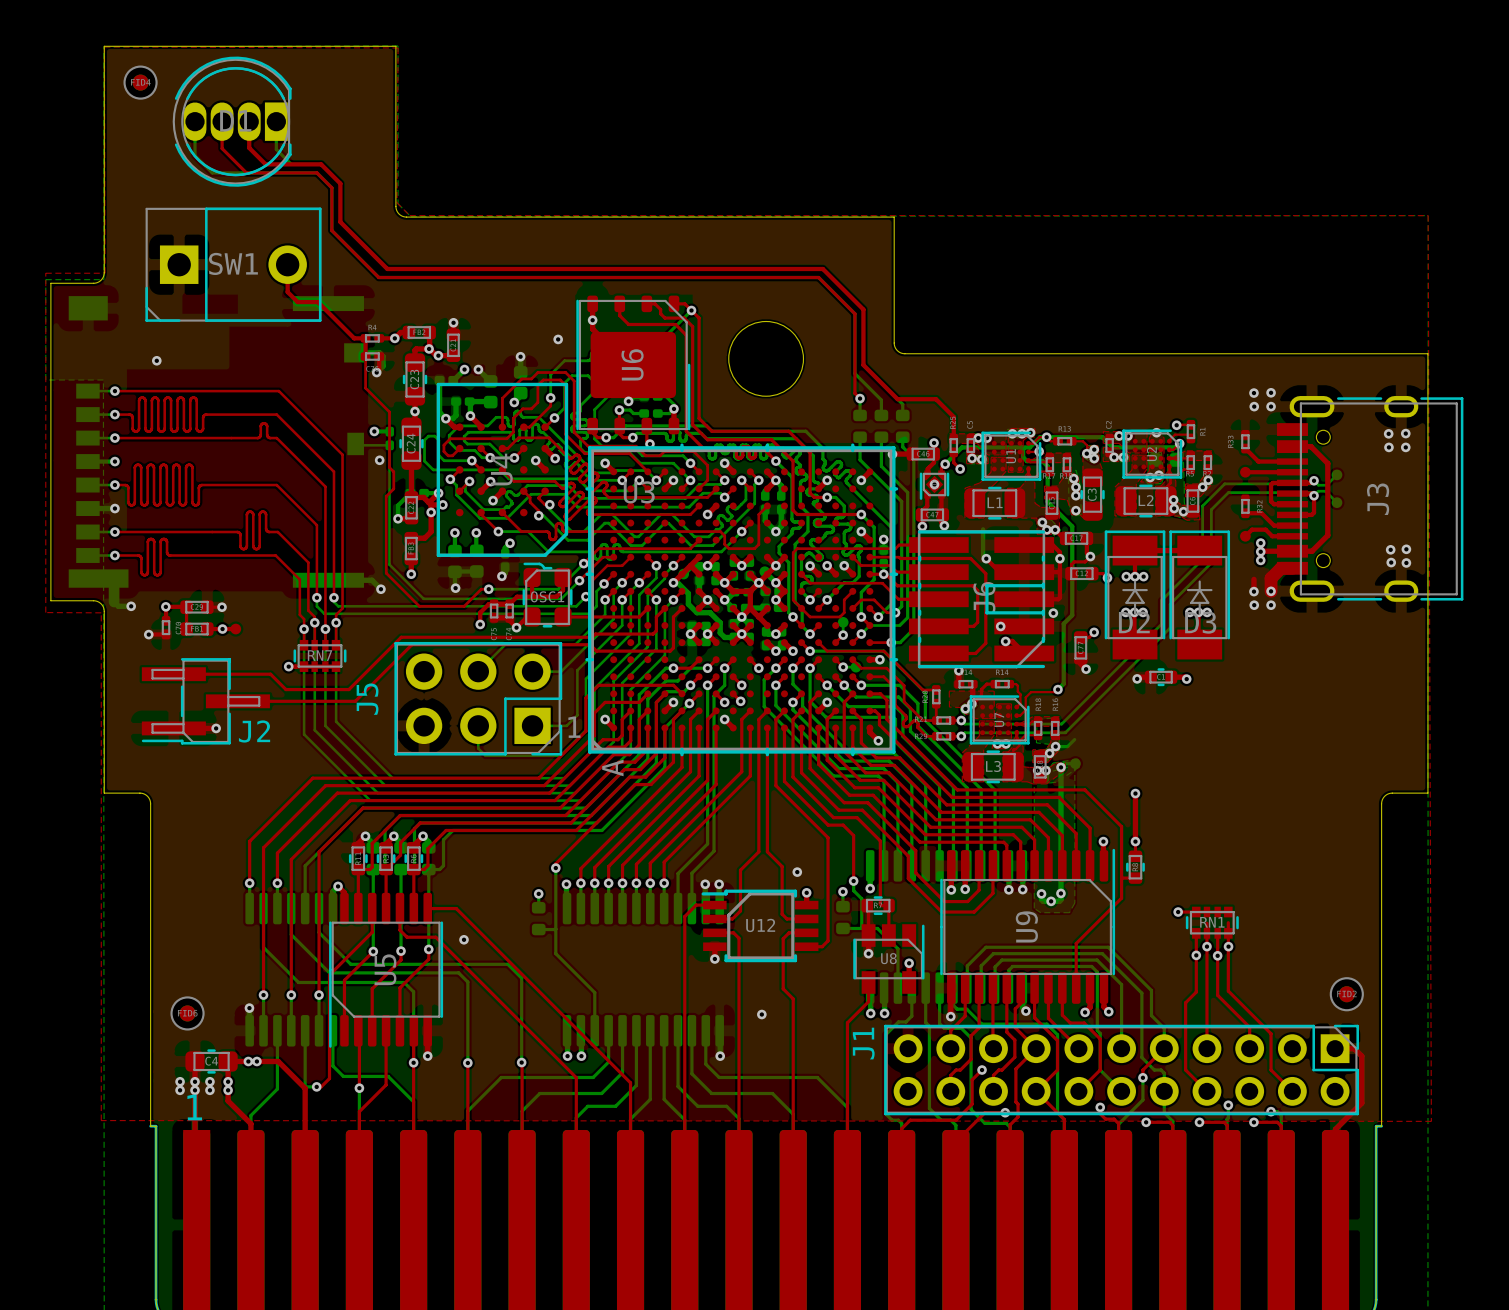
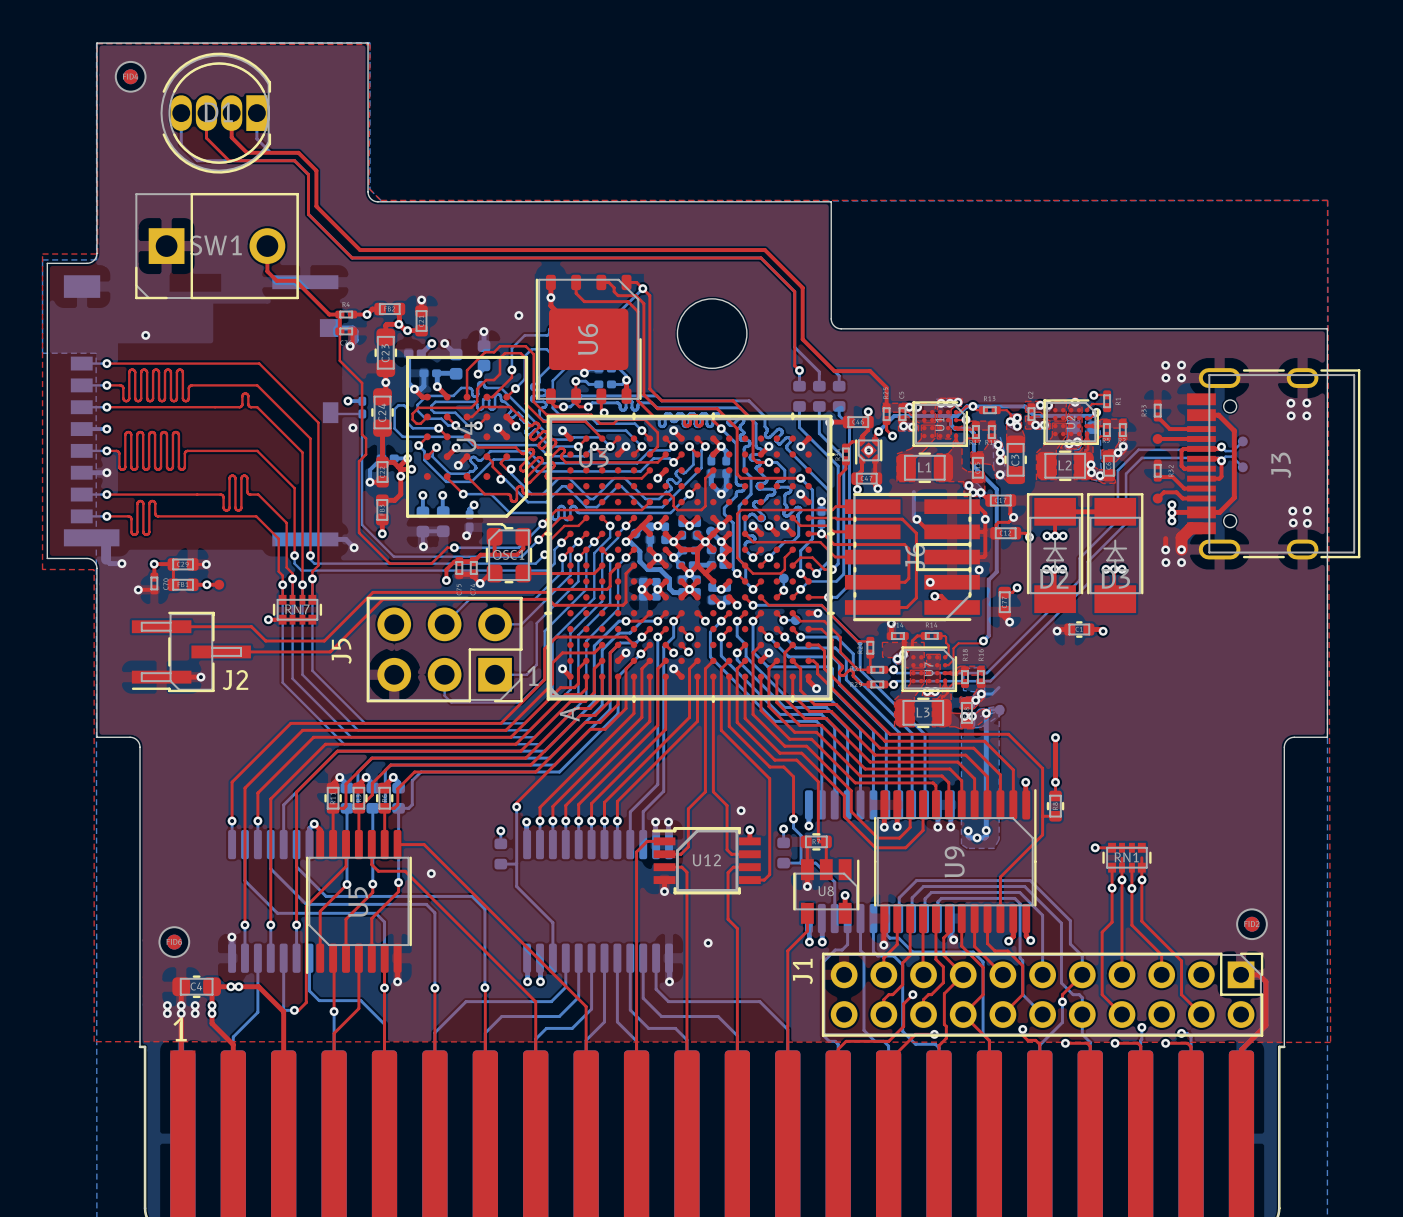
top track: none -> (862, 441) (852, 441) (845, 448)
part: none -> (845, 454)
top track: none -> (845, 460) (845, 468) (839, 475) (839, 506)

